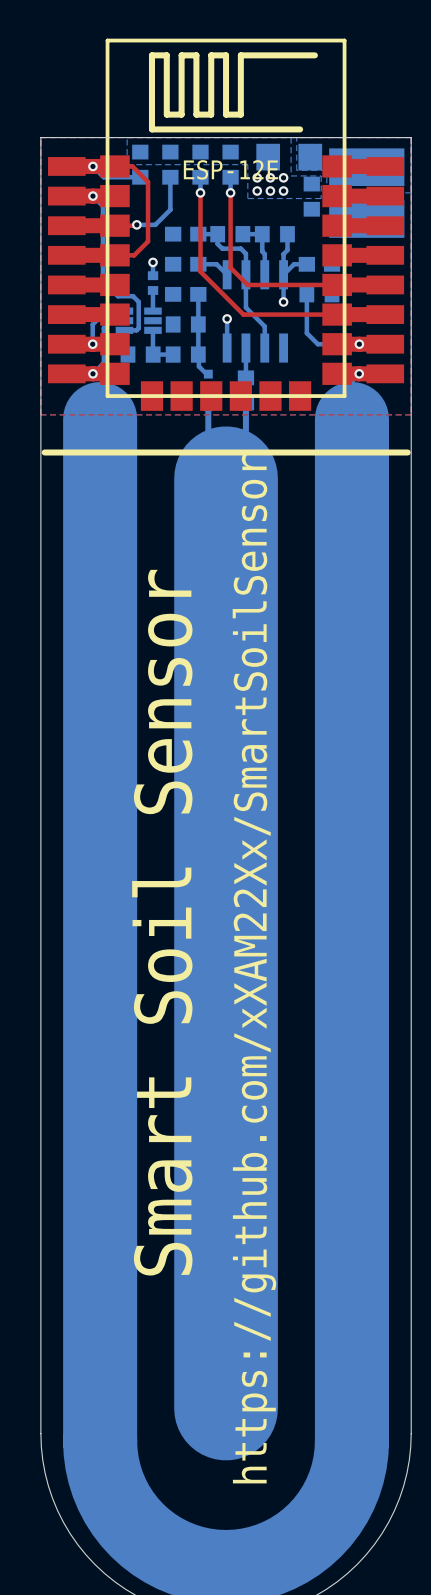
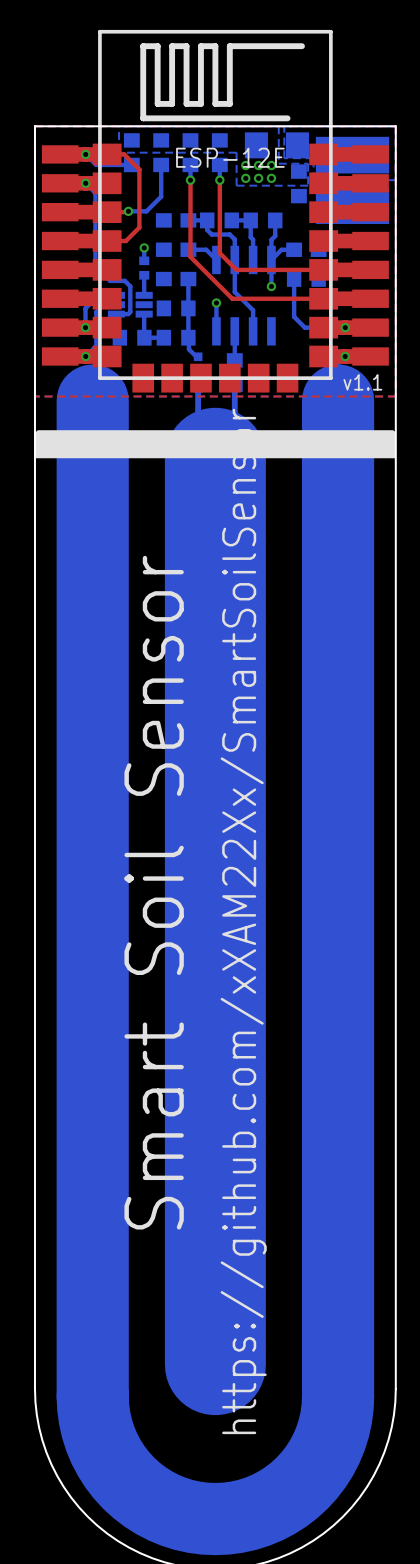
text: none -> v1.1 (362, 382)
drawing: none -> [34, 432, 396, 459]

